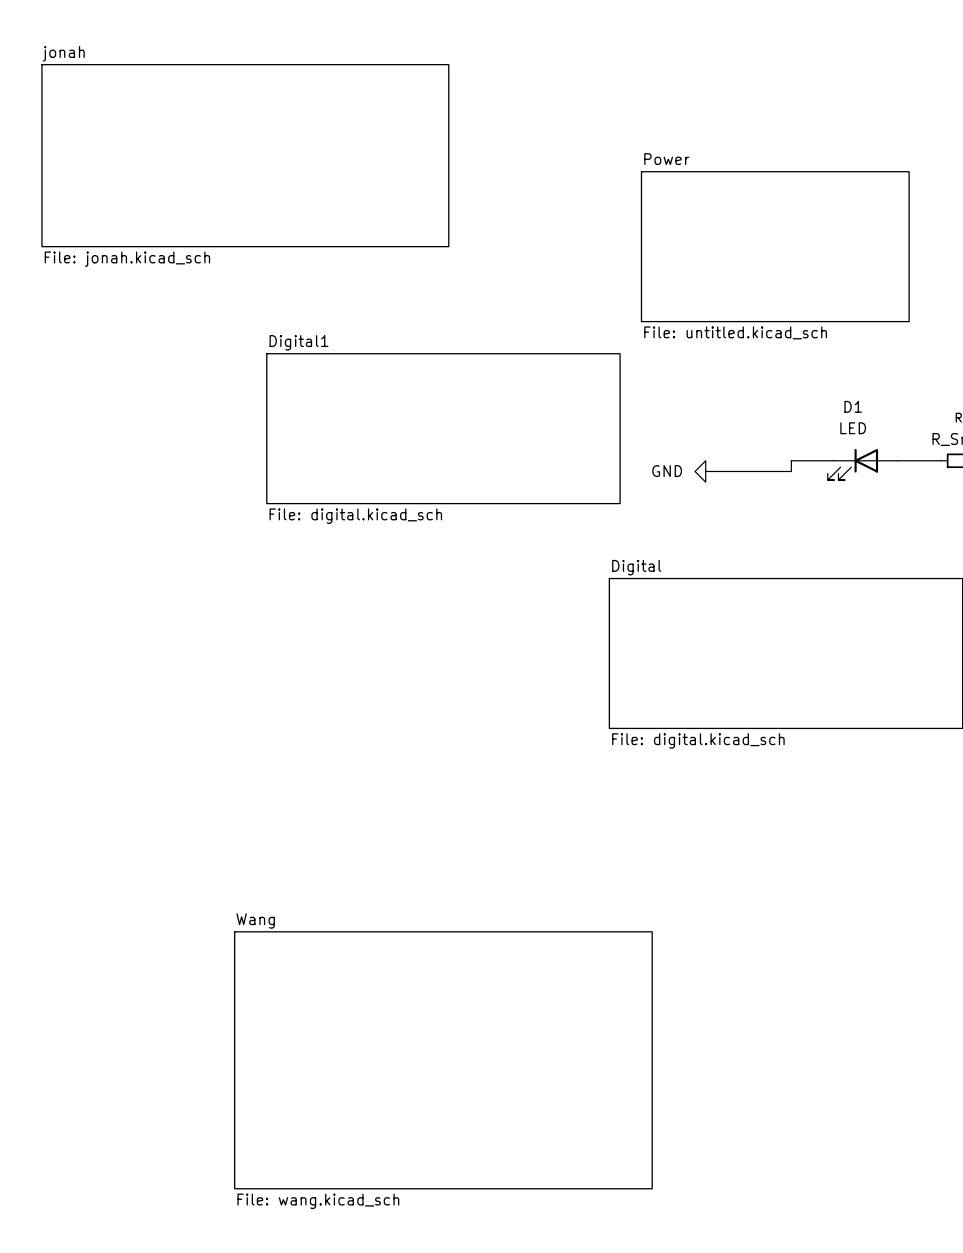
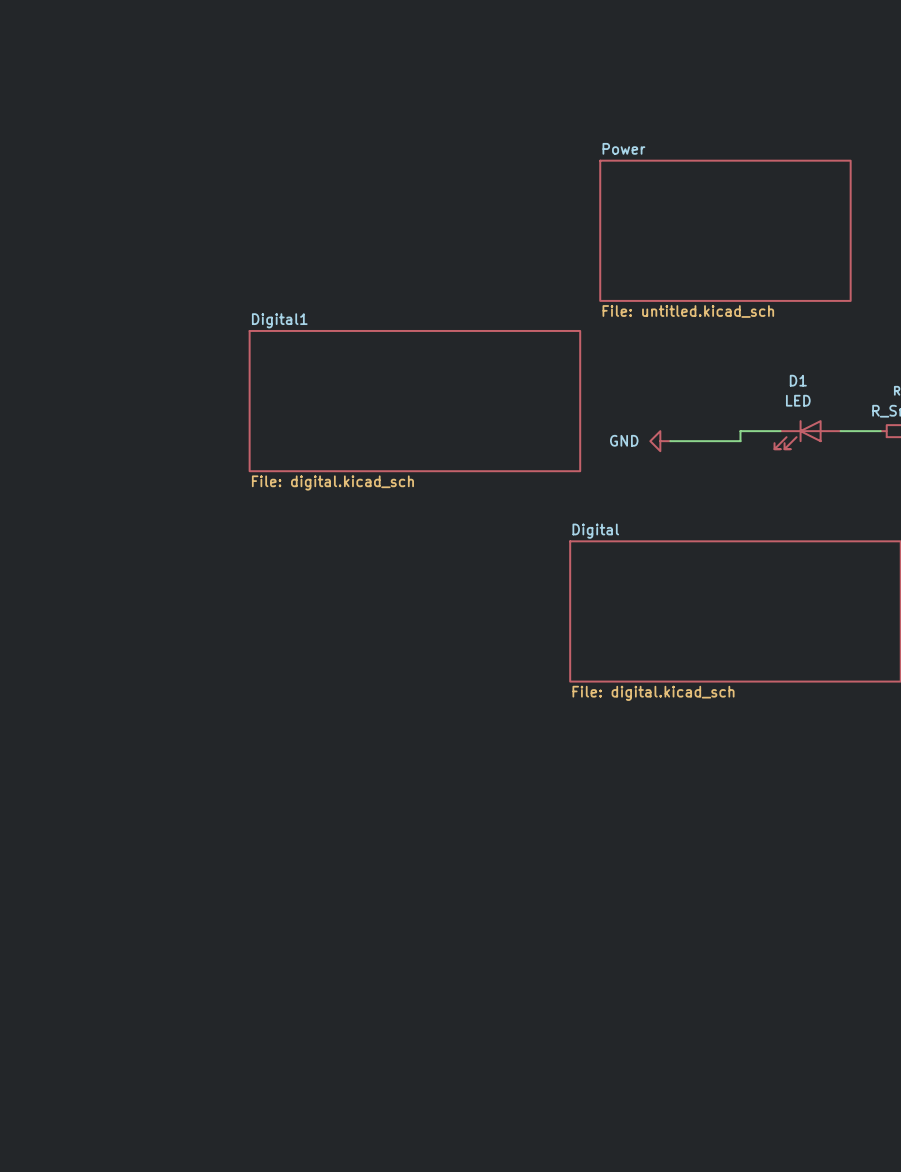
sheet jonah: File: jonah.kicad_sch (245, 155) -> none
sheet Wang: File: wang.kicad_sch (443, 1060) -> none

